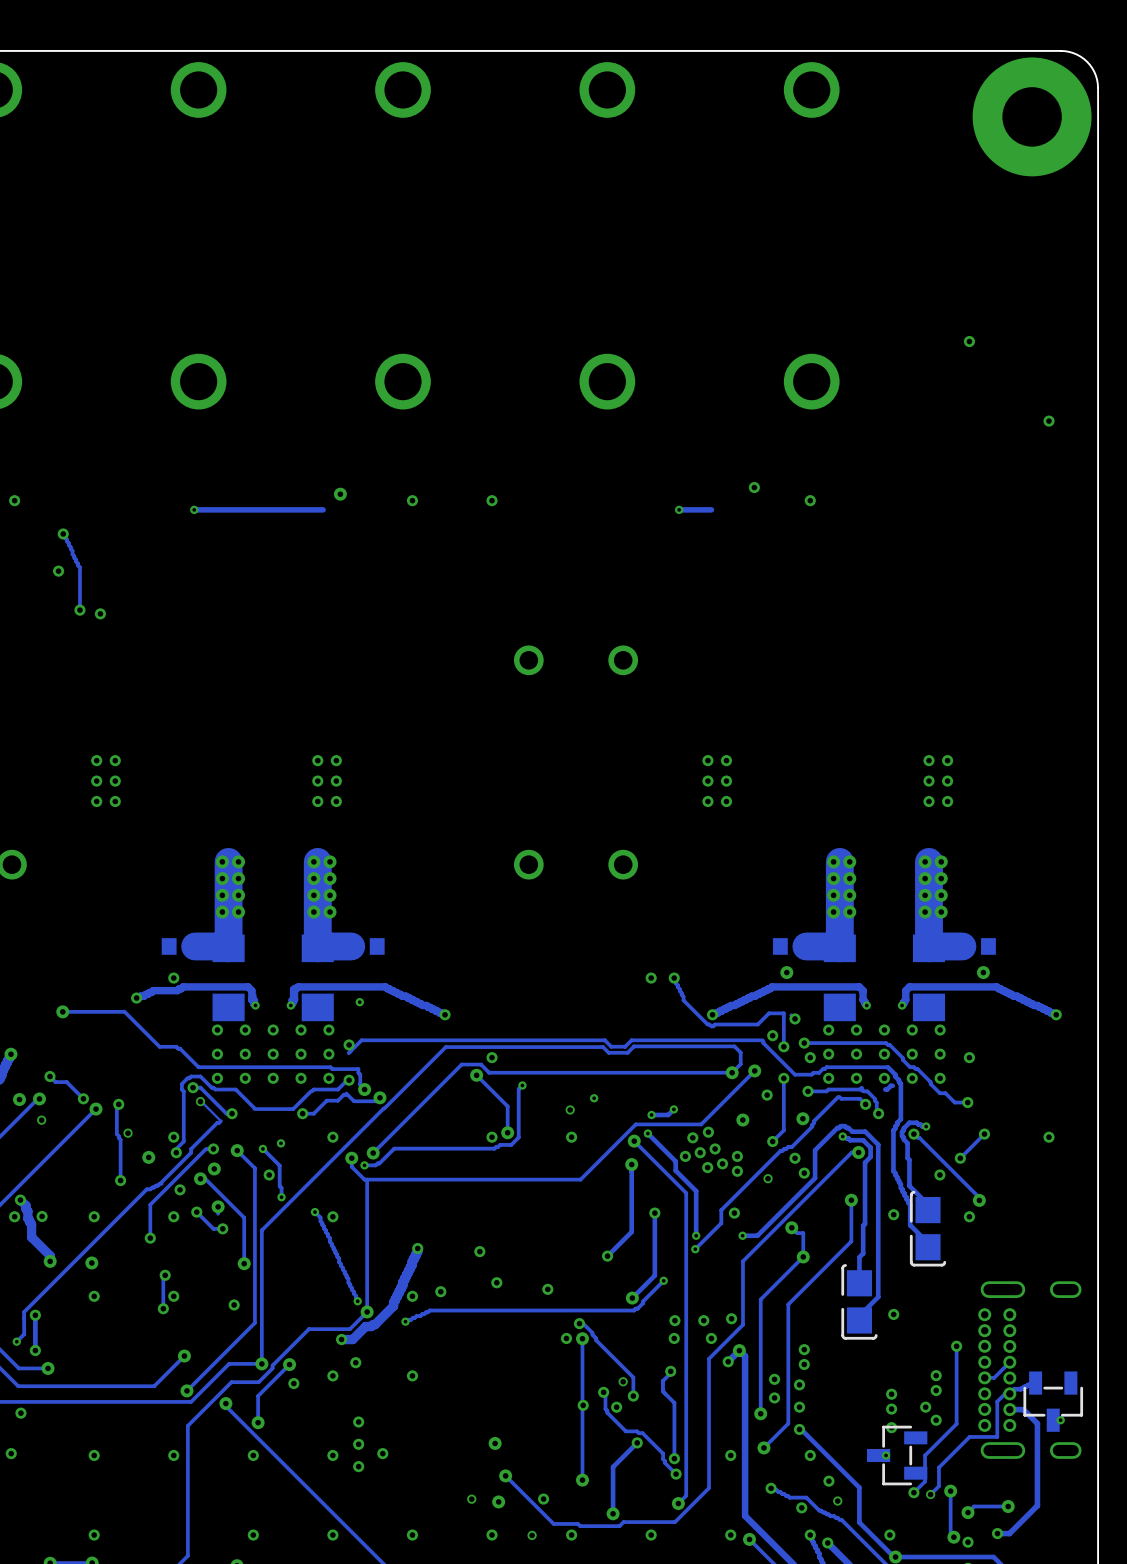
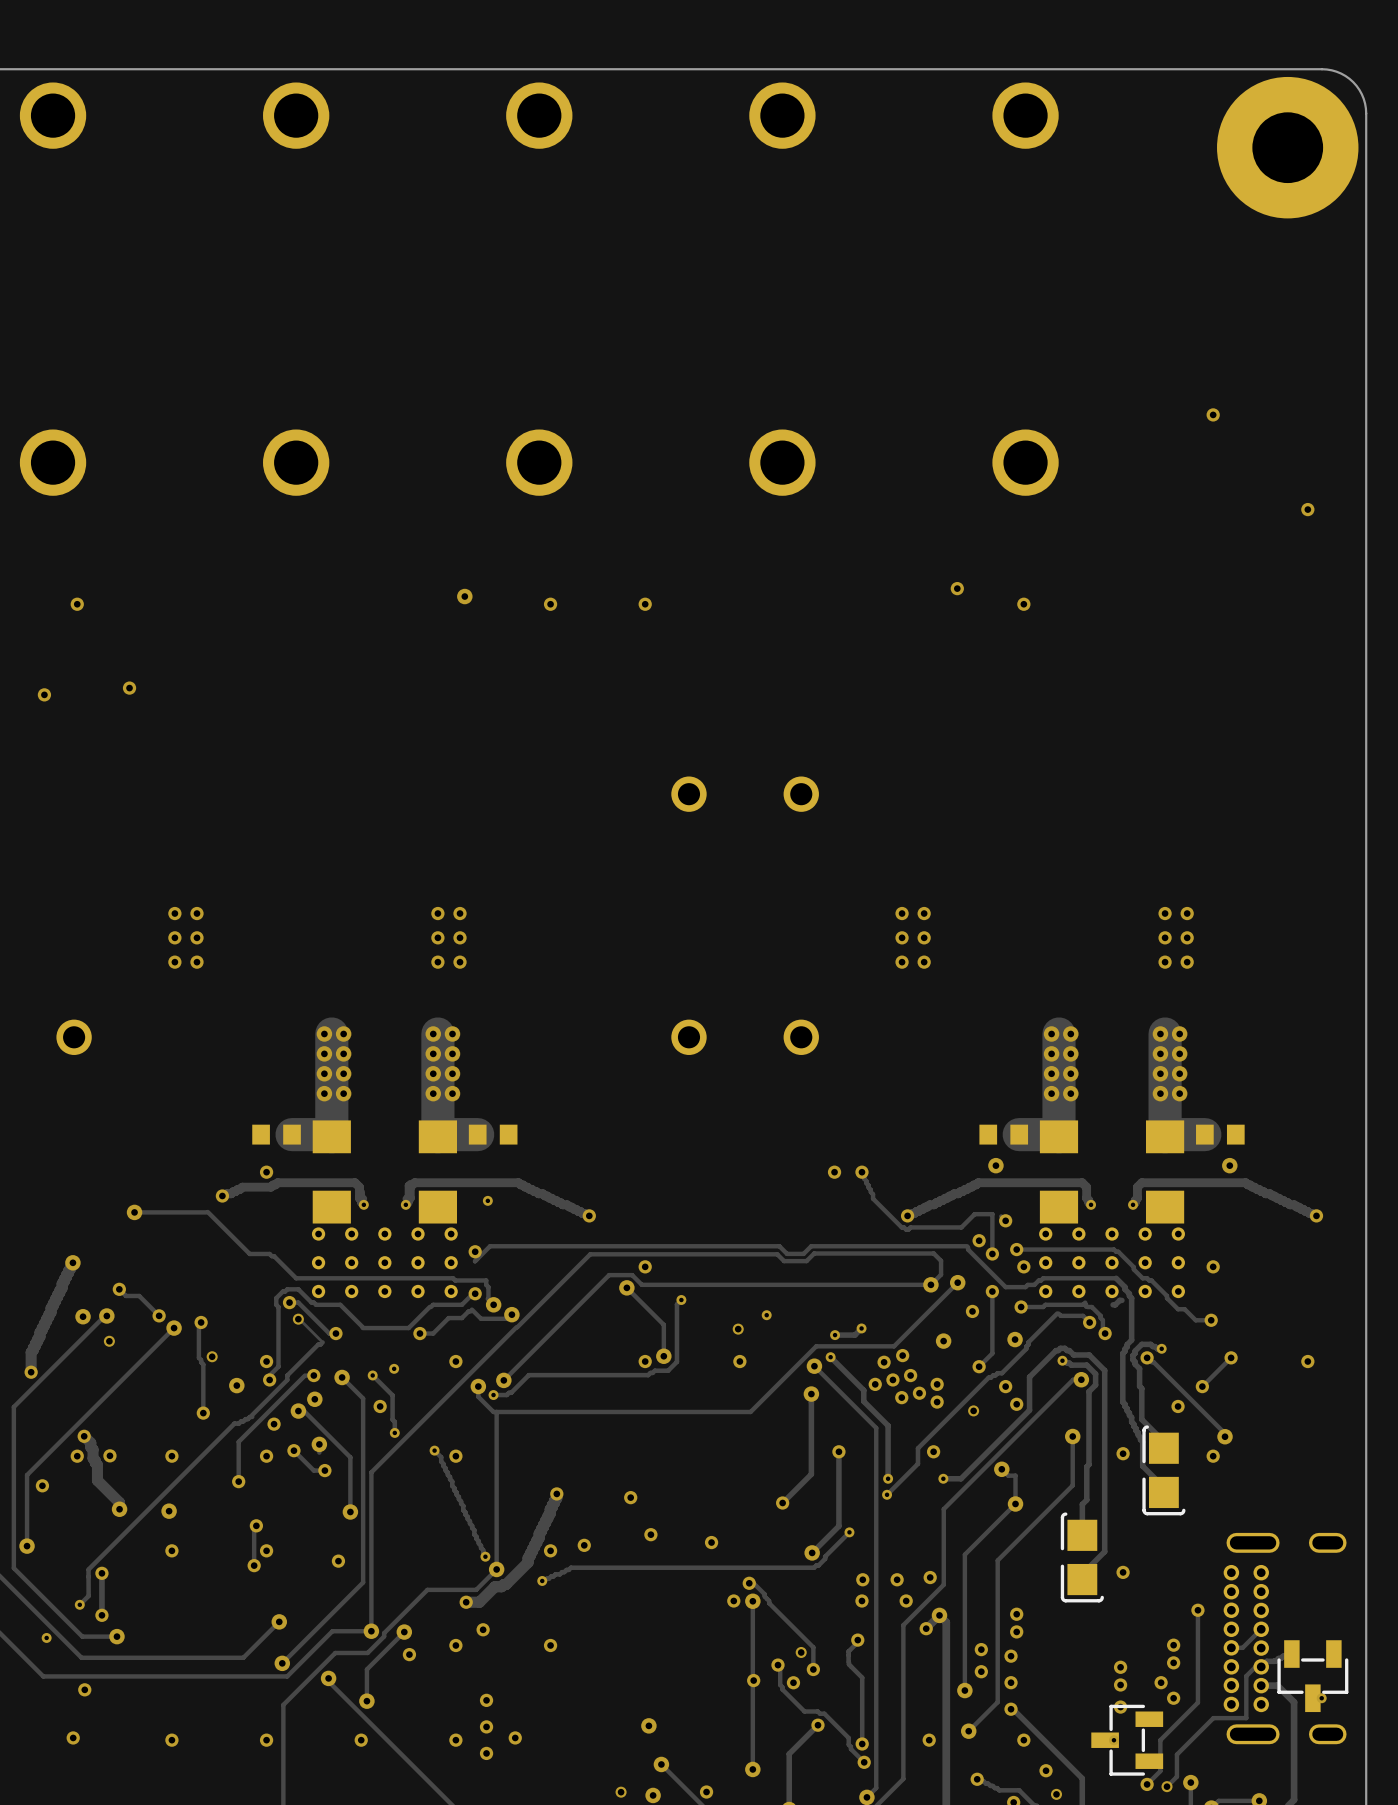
via: (194, 509) -> none
track: (323, 509) (194, 509) -> none
via: (679, 509) -> none
track: (711, 509) (679, 509) -> none
track: (63, 533) (79, 567) (79, 610) -> none
via: (63, 533) -> none
via: (79, 610) -> none
via: (100, 613) -> none

